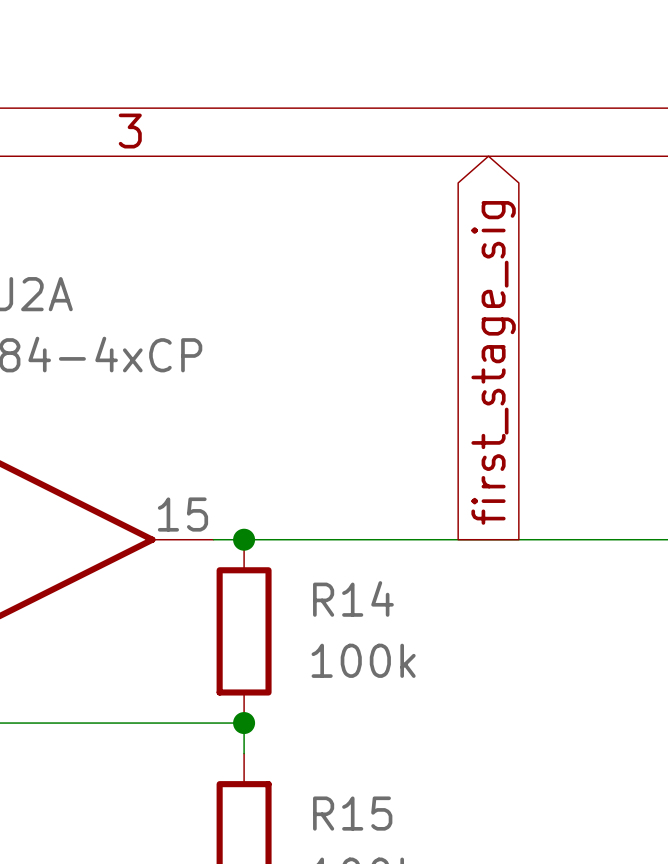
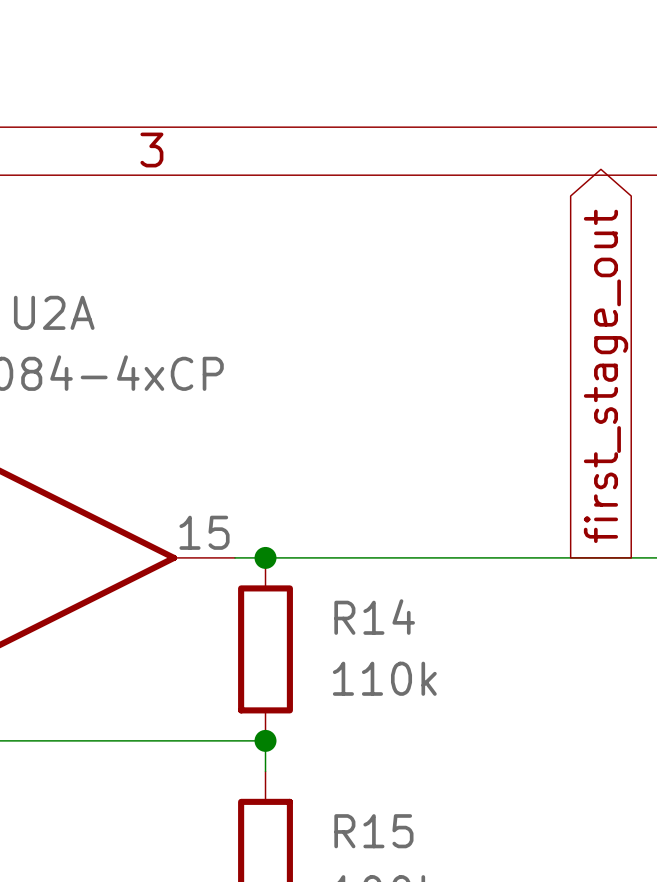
global label: none -> first_stage_out (606, 376)
global label: first_stage_sig (493, 362) -> none
R14 value: 100k (363, 660) -> 110k (384, 678)

